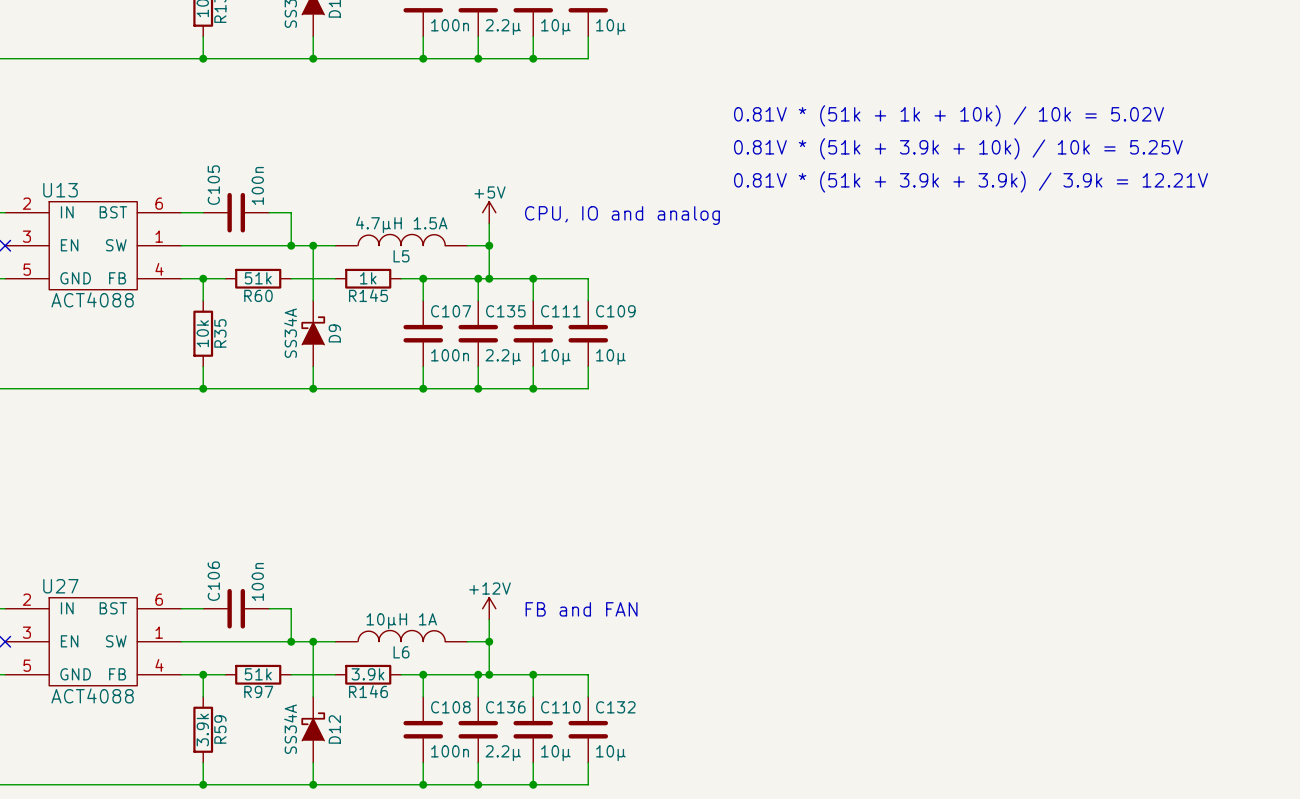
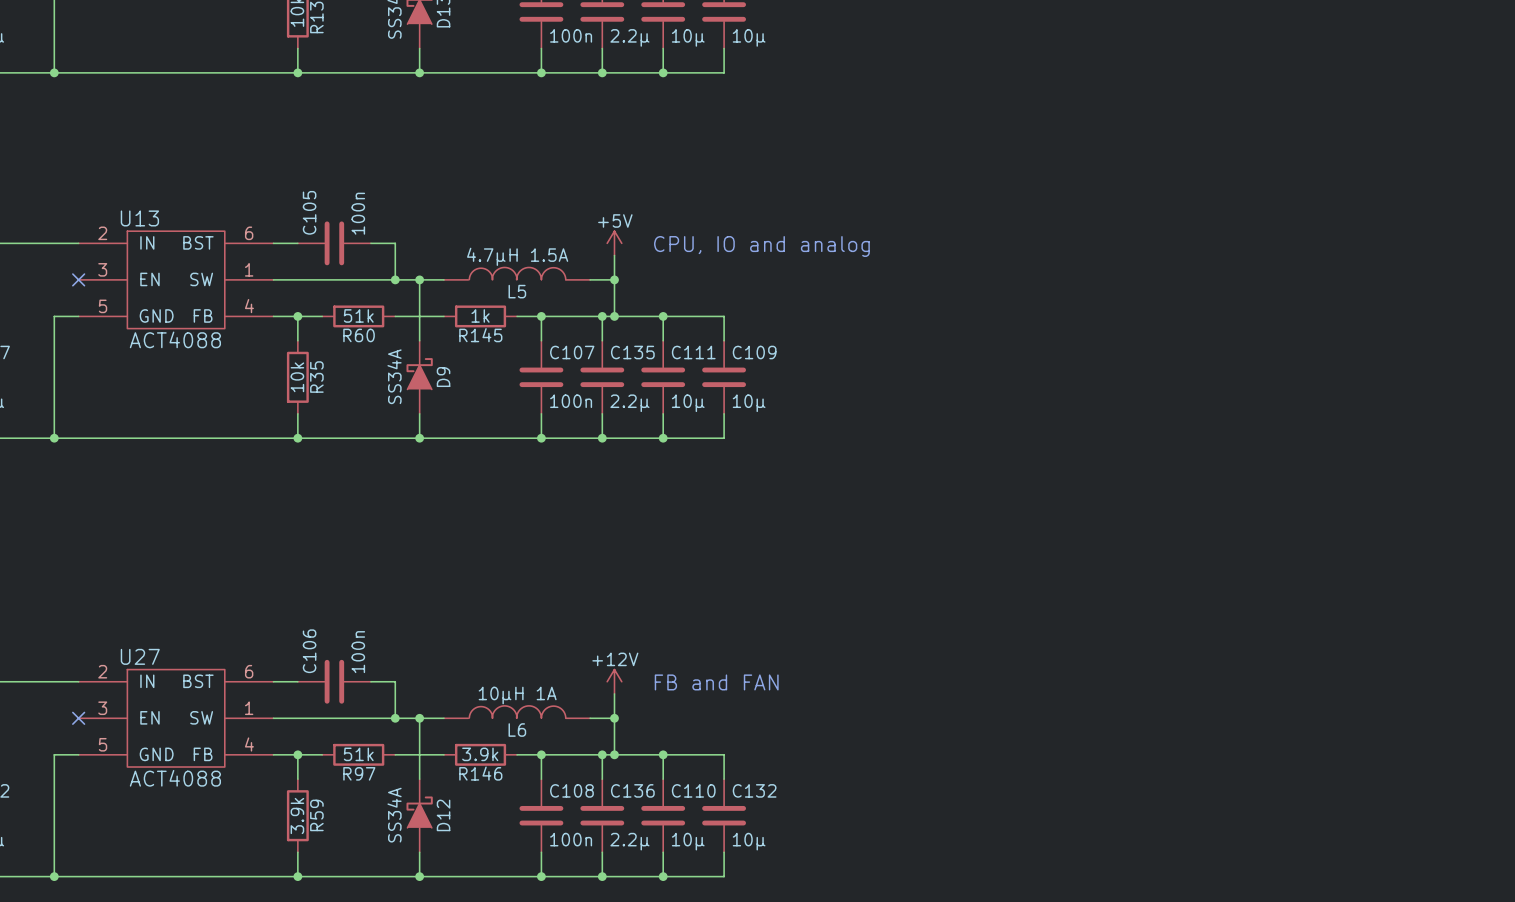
text: 0.81V * (51k + 1k + 10k) / 10k = 5.02V (949, 115) -> none
text: 0.81V * (51k + 3.9k + 10k) / 10k = 5.25V (958, 148) -> none
text: 0.81V * (51k + 3.9k + 3.9k) / 3.9k = 12.21V (971, 181) -> none

